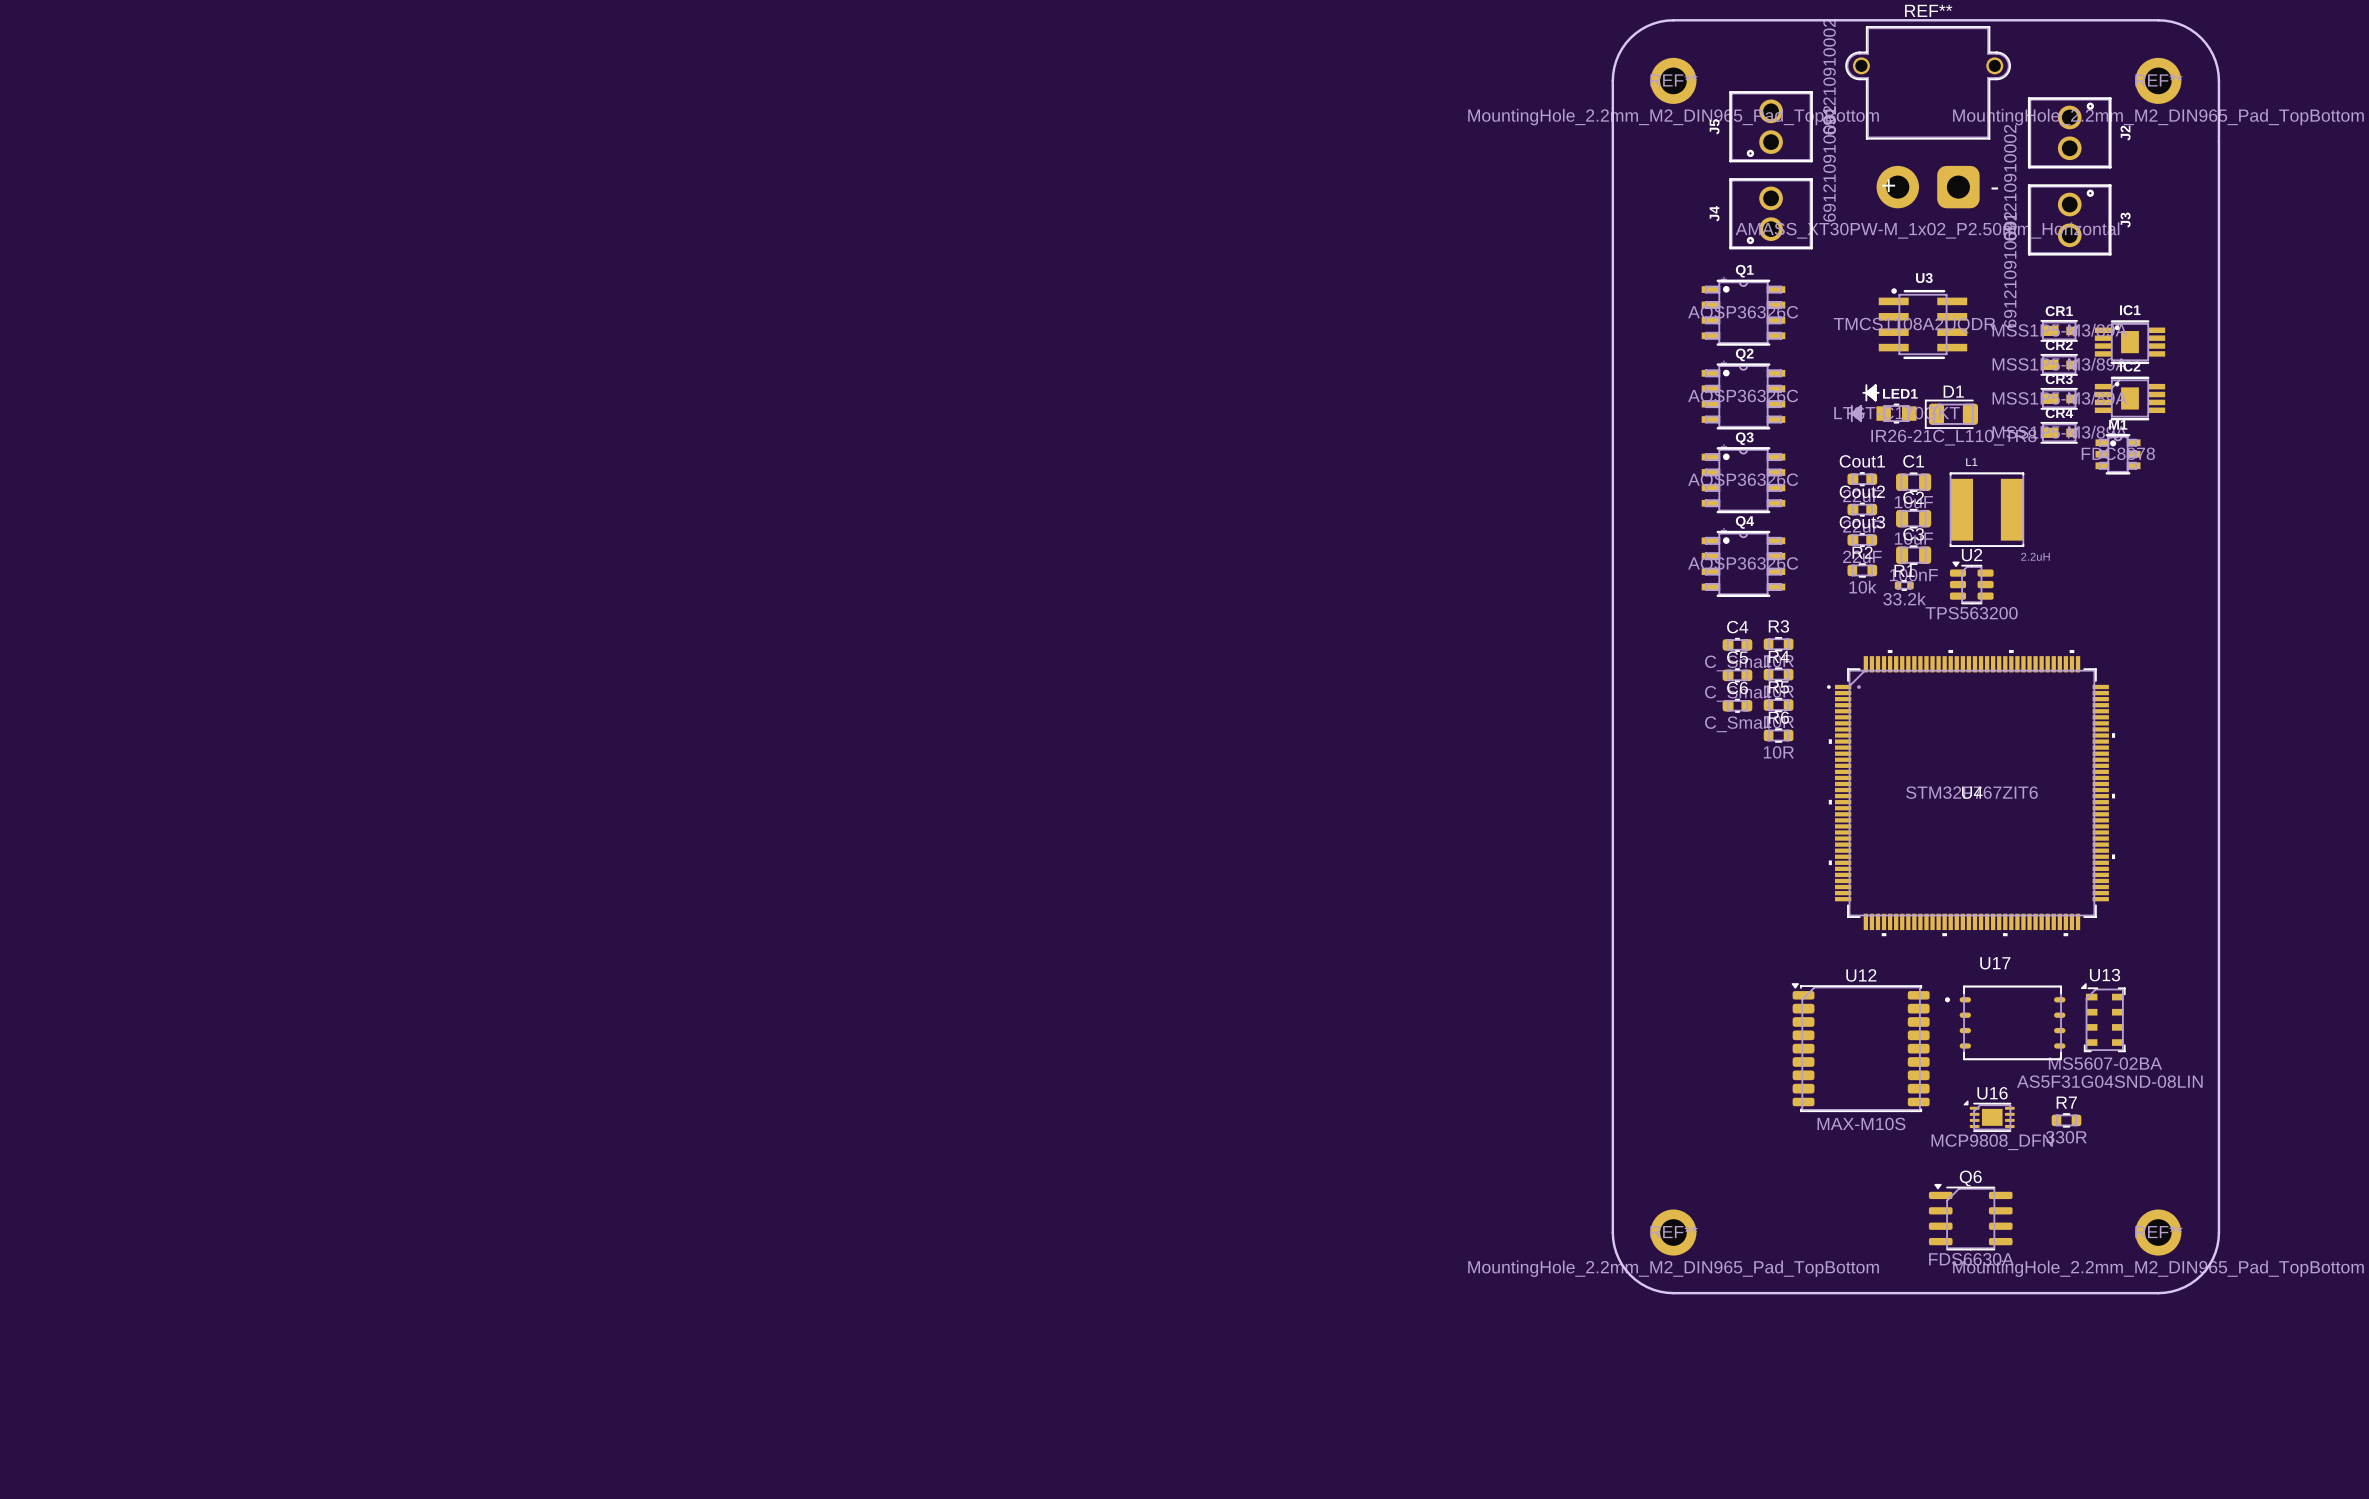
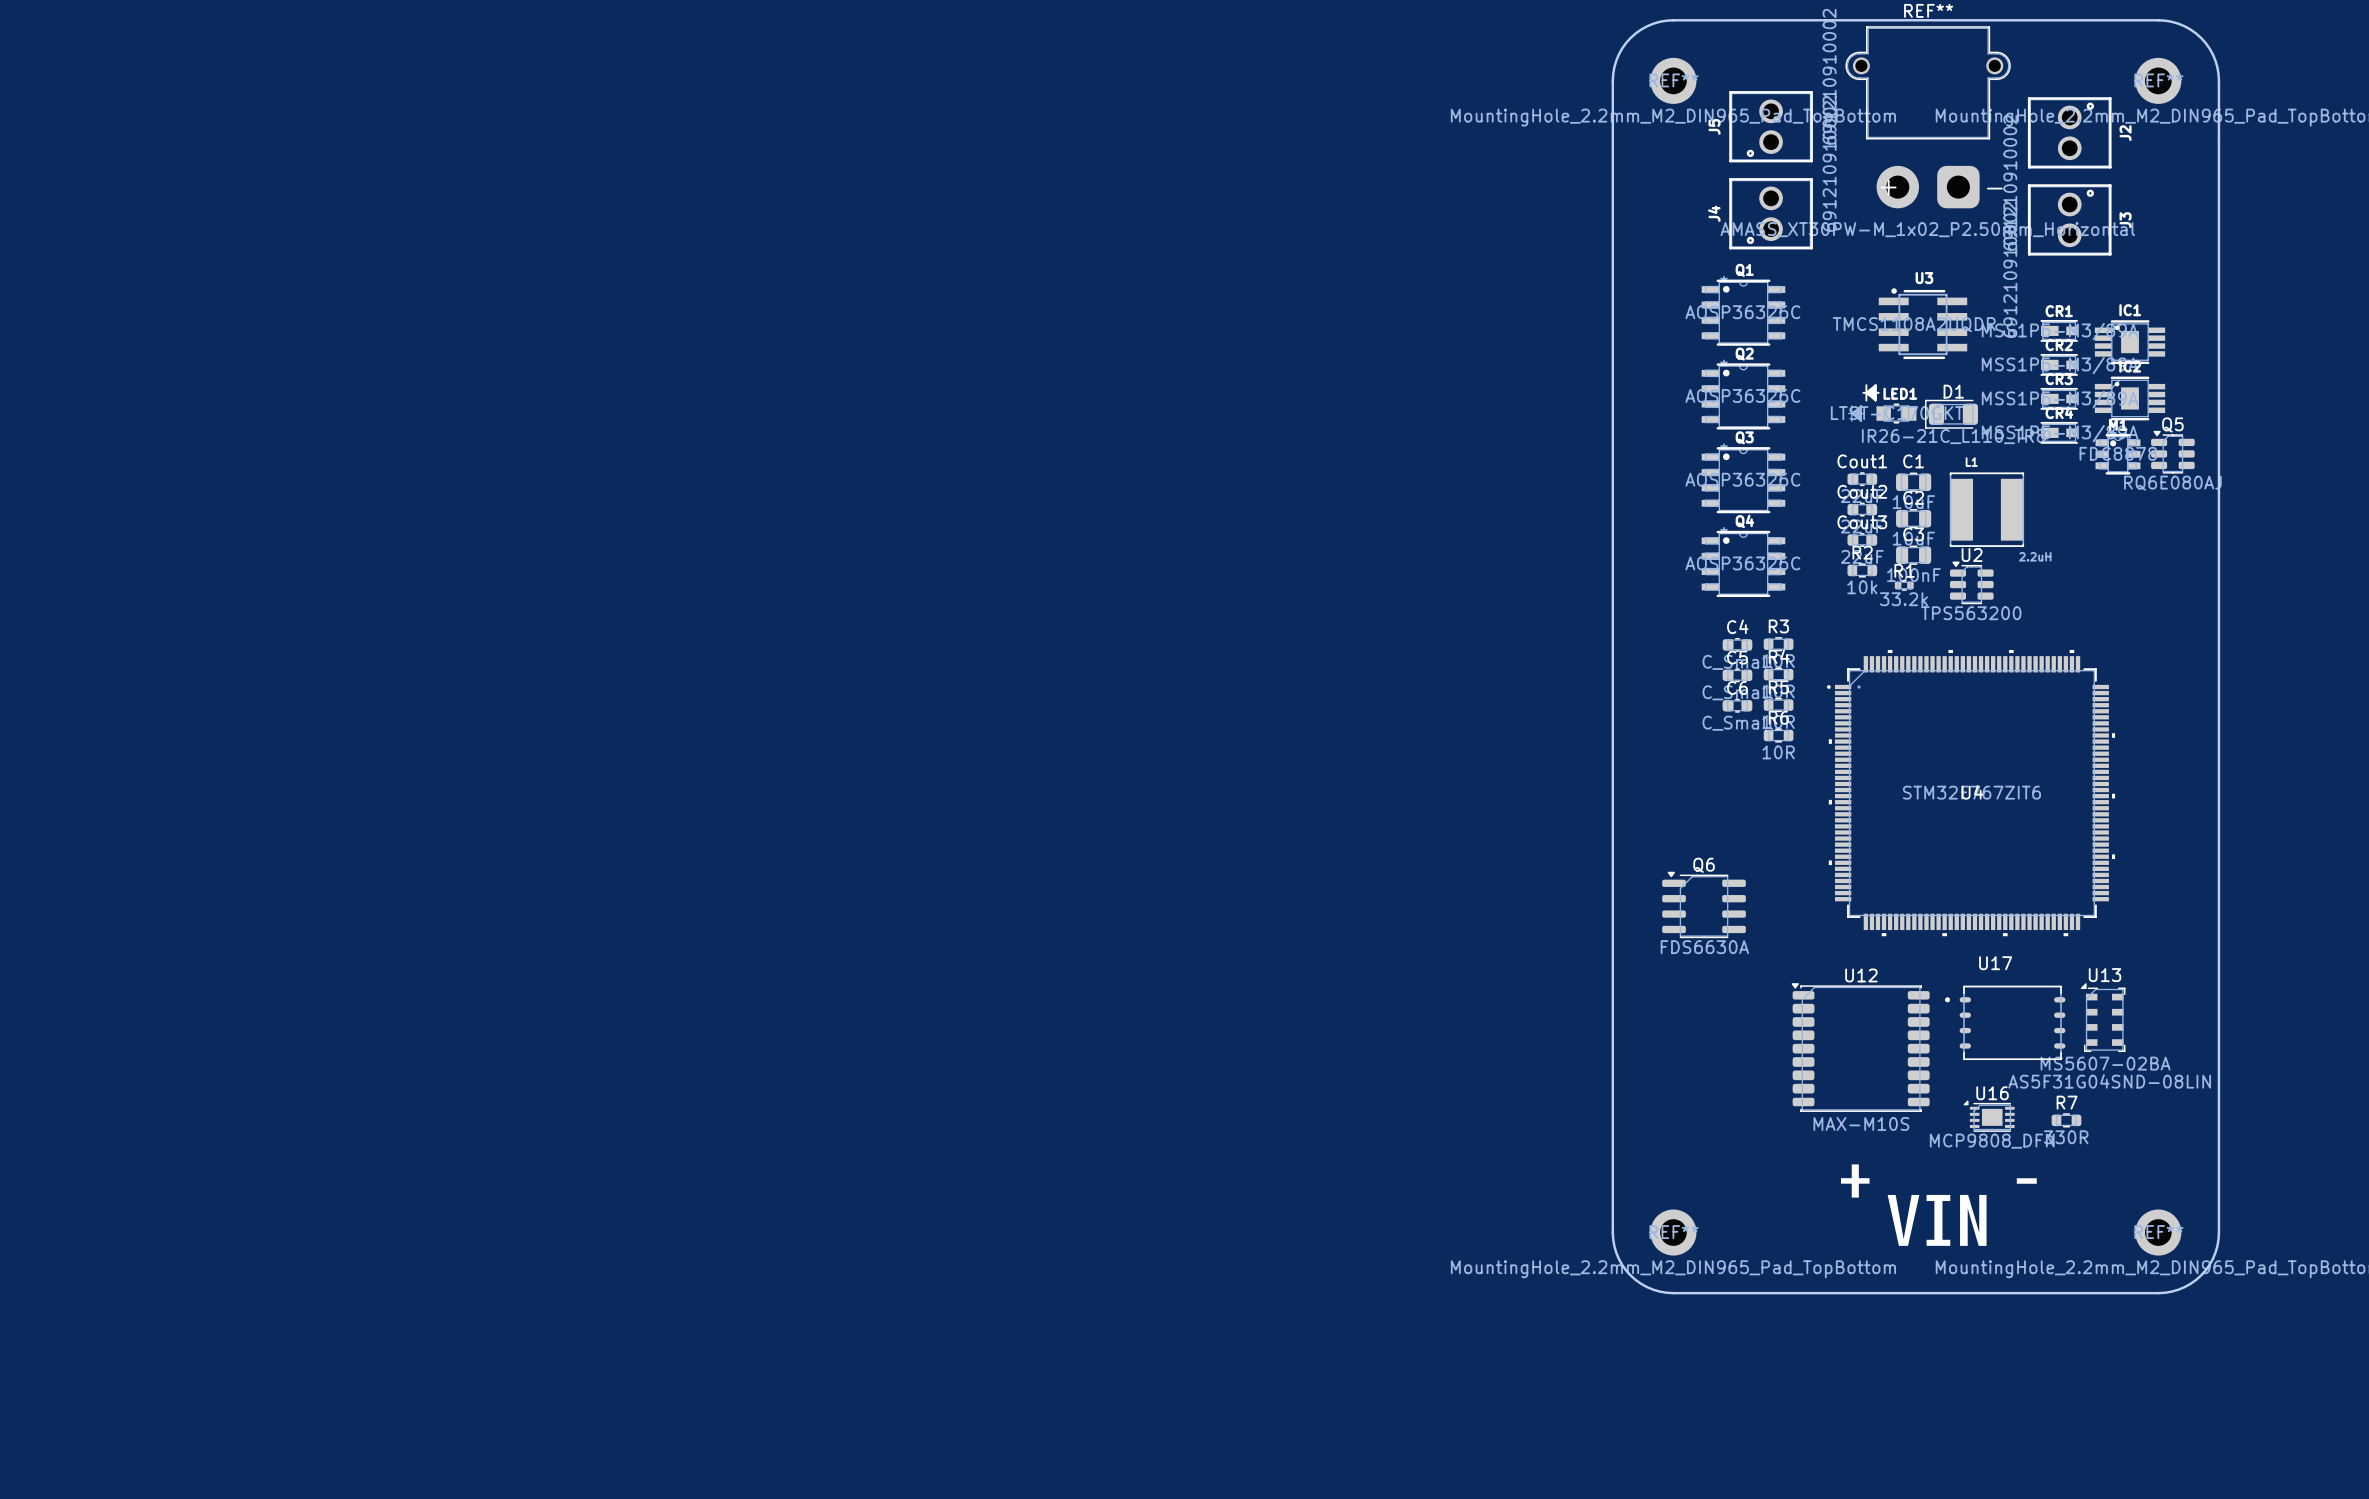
Q5: none -> RQ6E080AJ (2172, 452)
drawing: none -> [1840, 1164, 1870, 1198]
drawing: none -> [2016, 1178, 2037, 1184]
drawing: none -> [1887, 1194, 1987, 1246]
Q6 position: (1970, 1217) -> (1704, 904)

